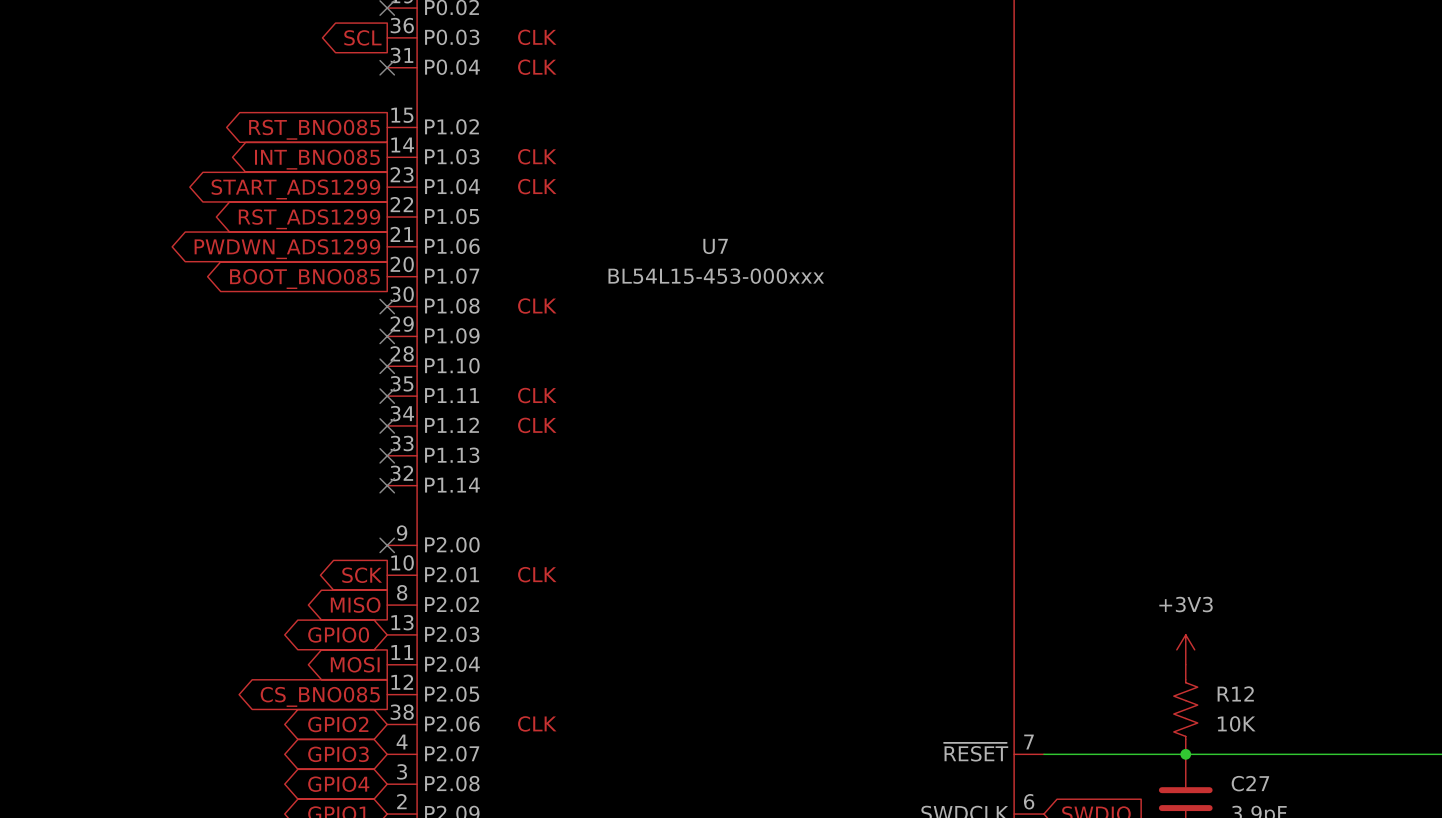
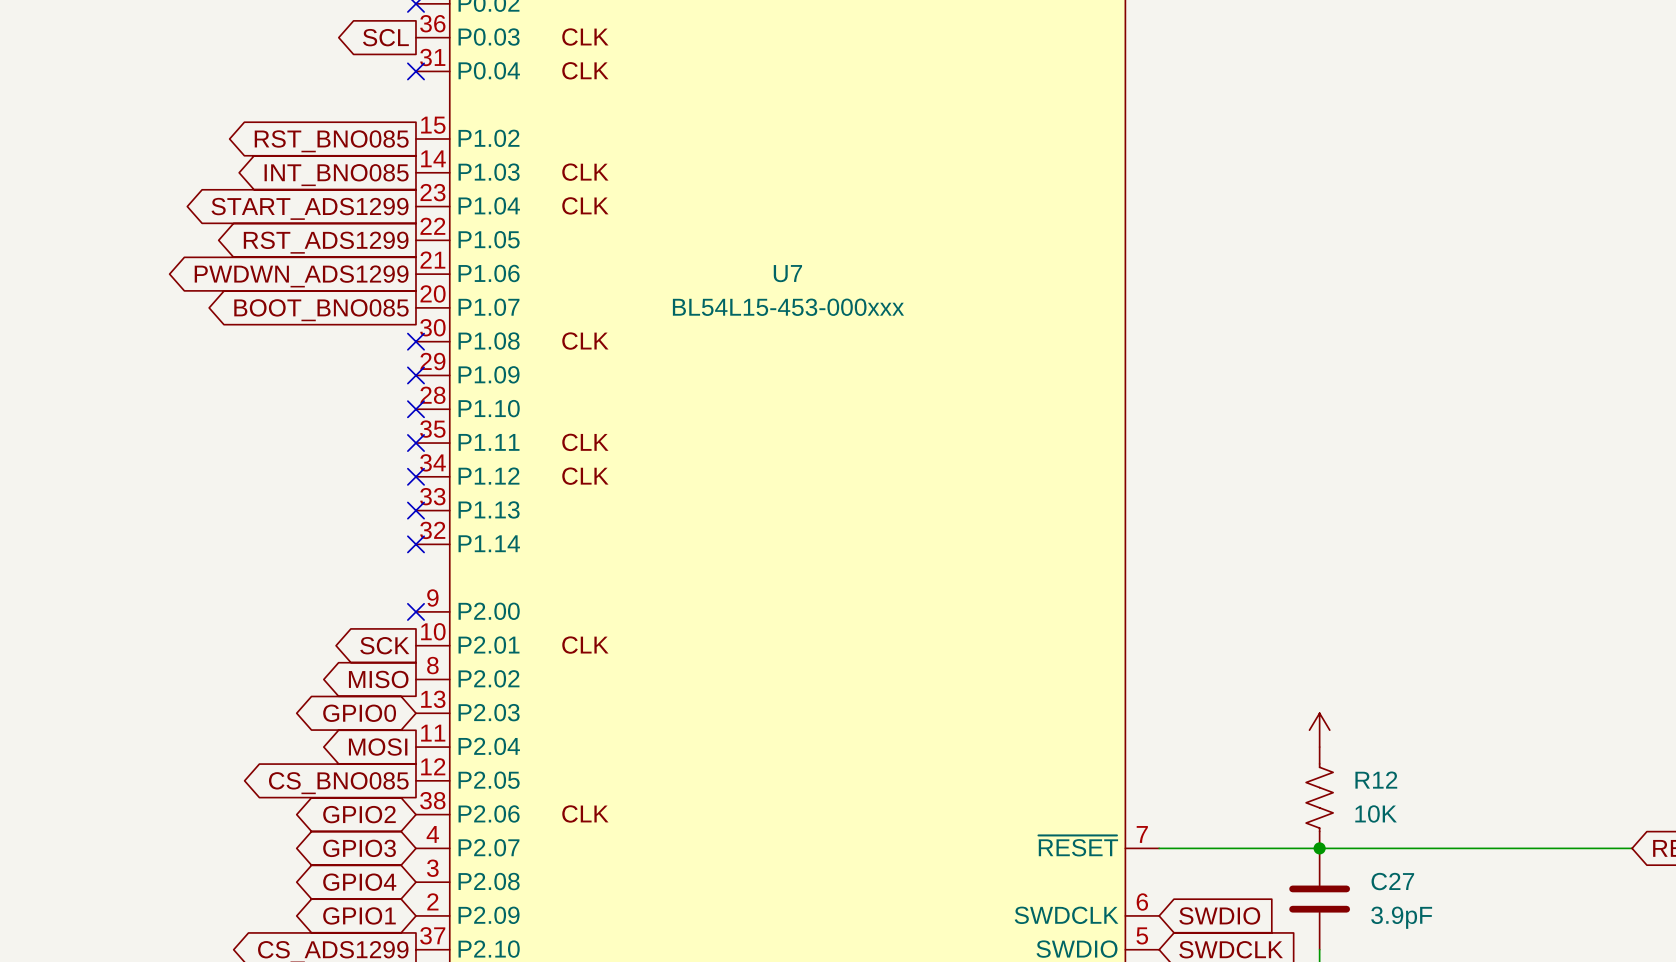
power symbol text: +3V3 (1186, 604) -> none

